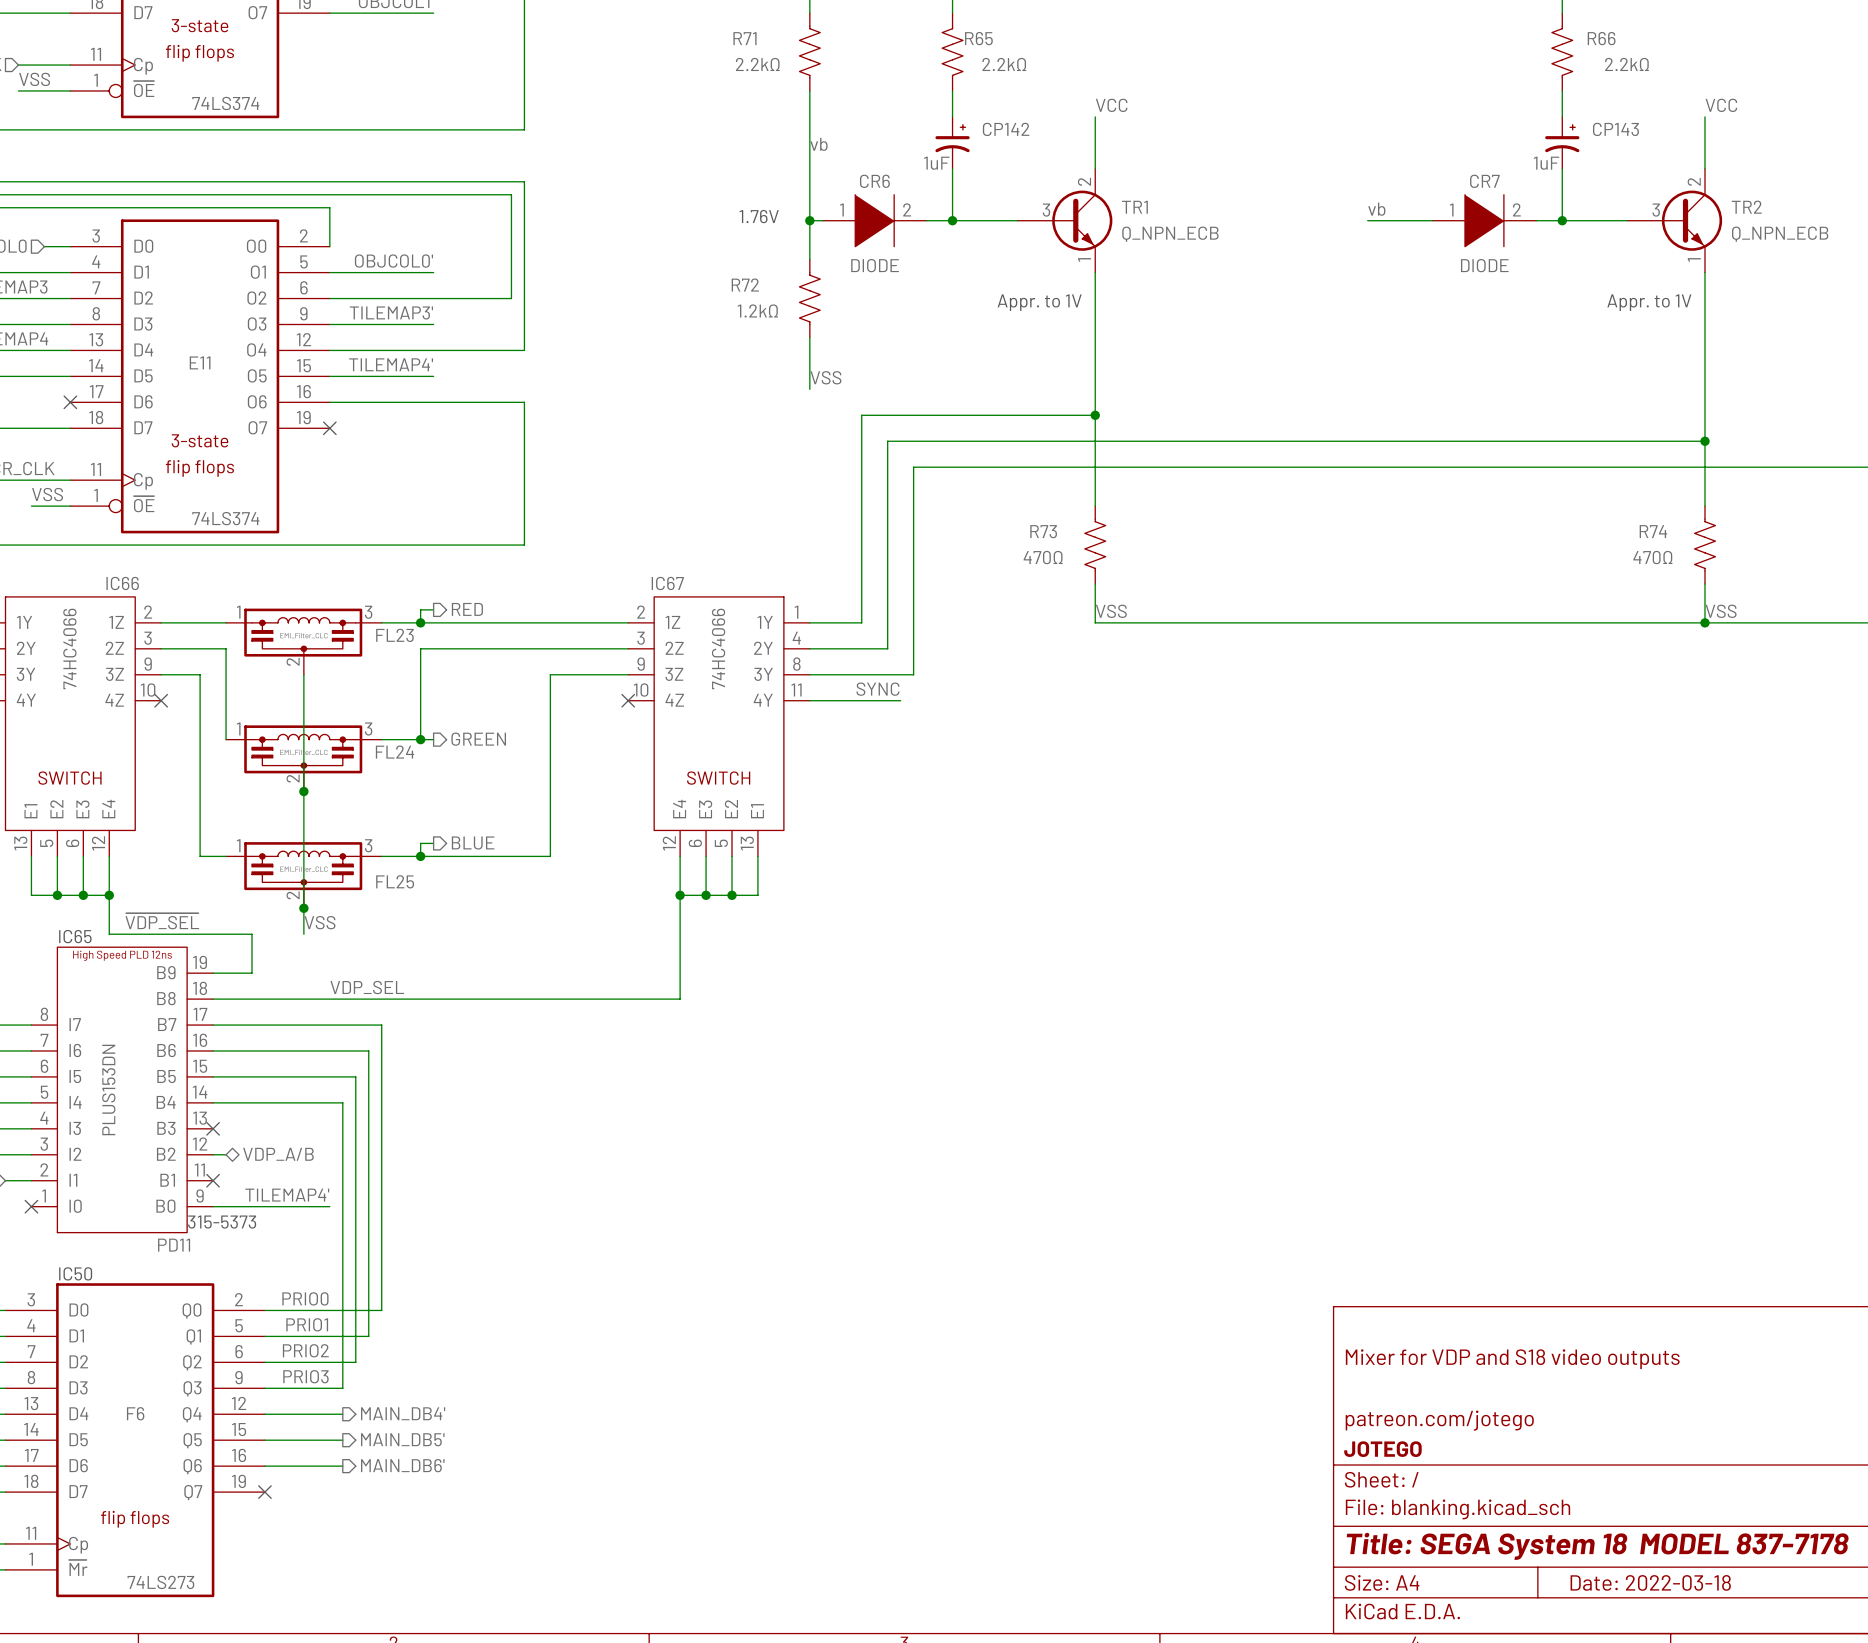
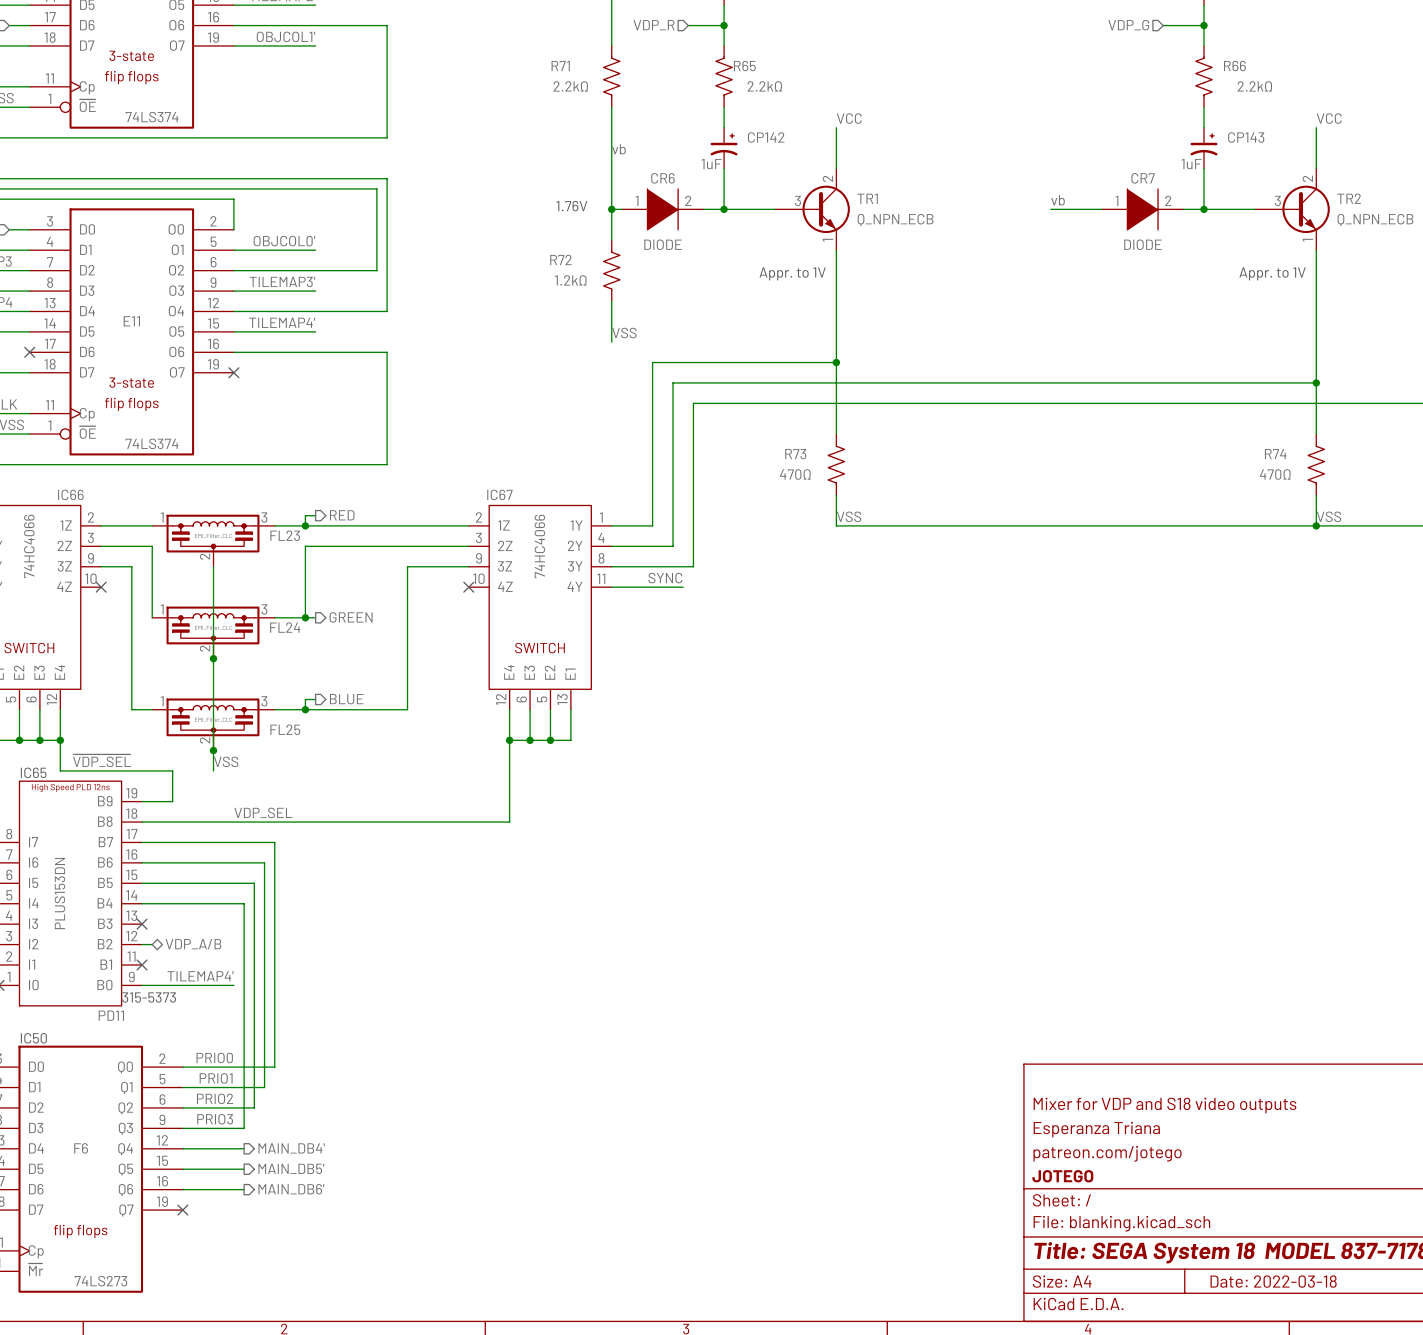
title block: none -> Esperanza Triana (1096, 1129)

